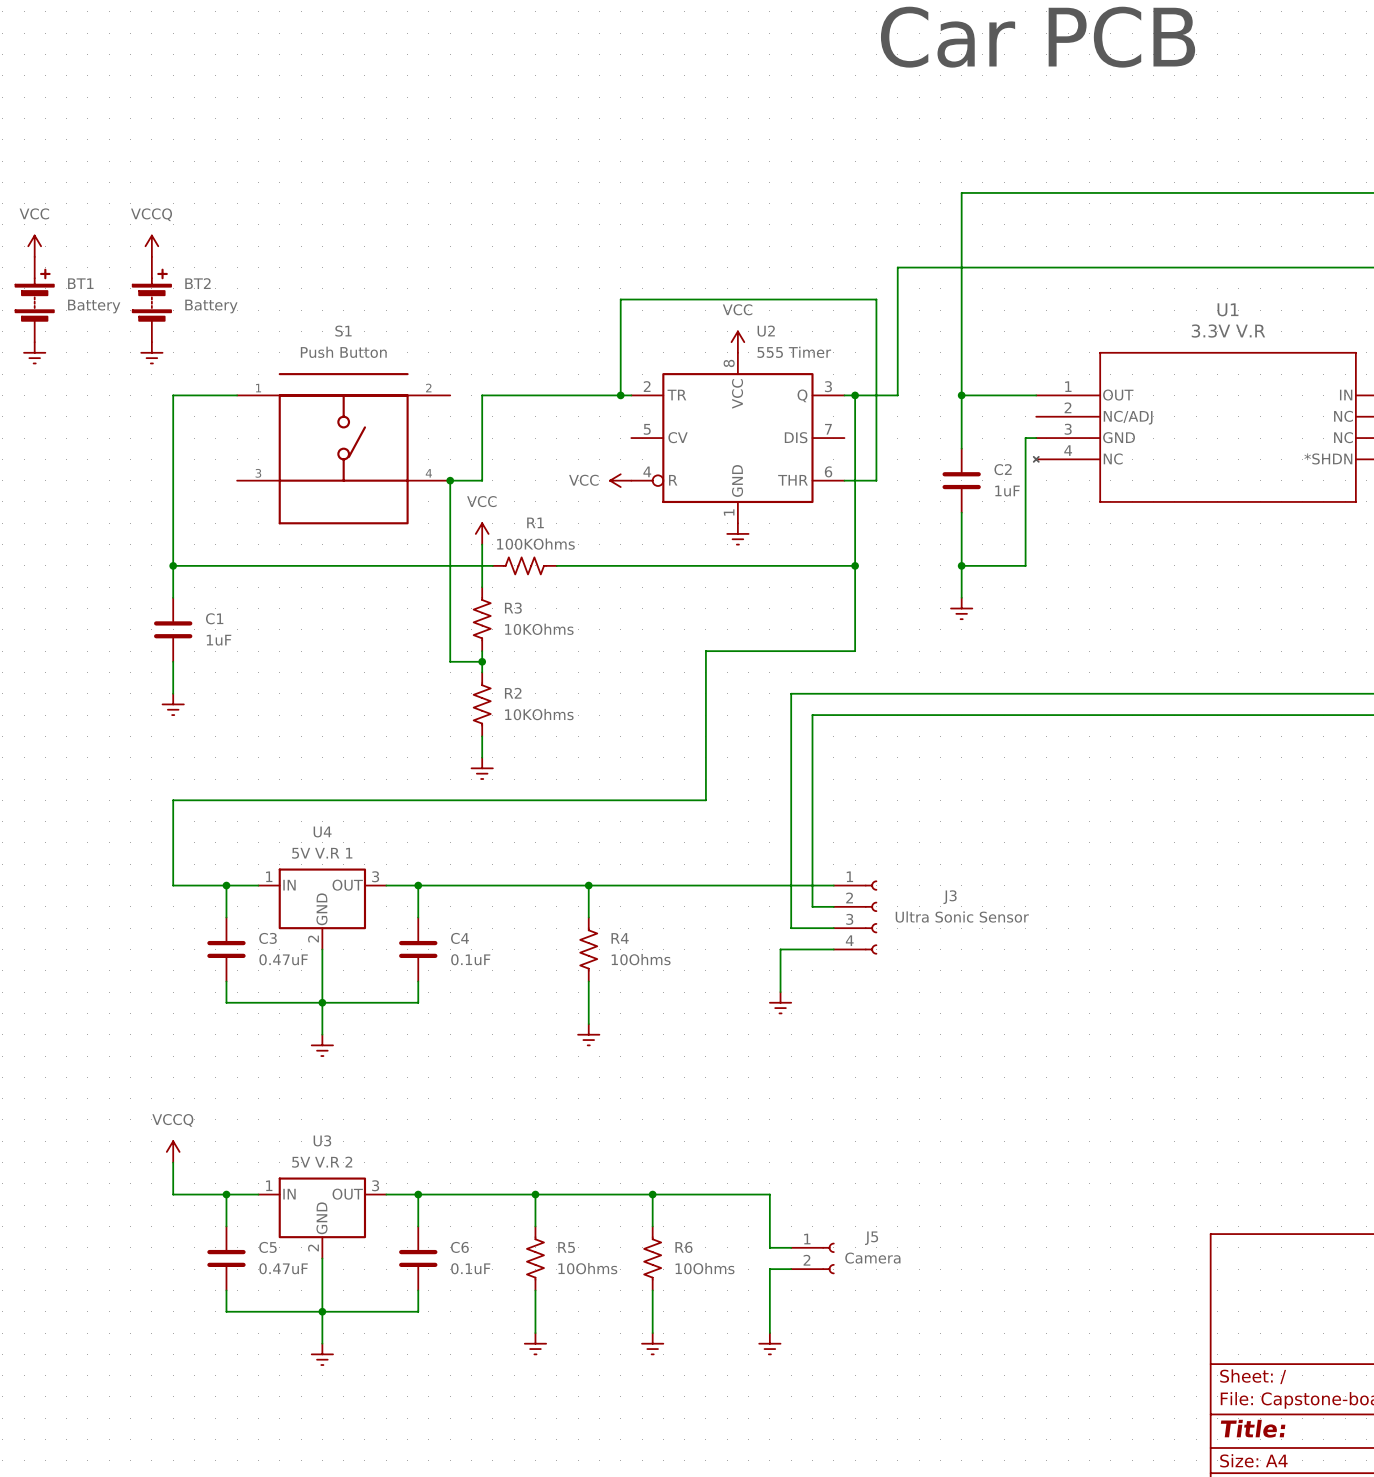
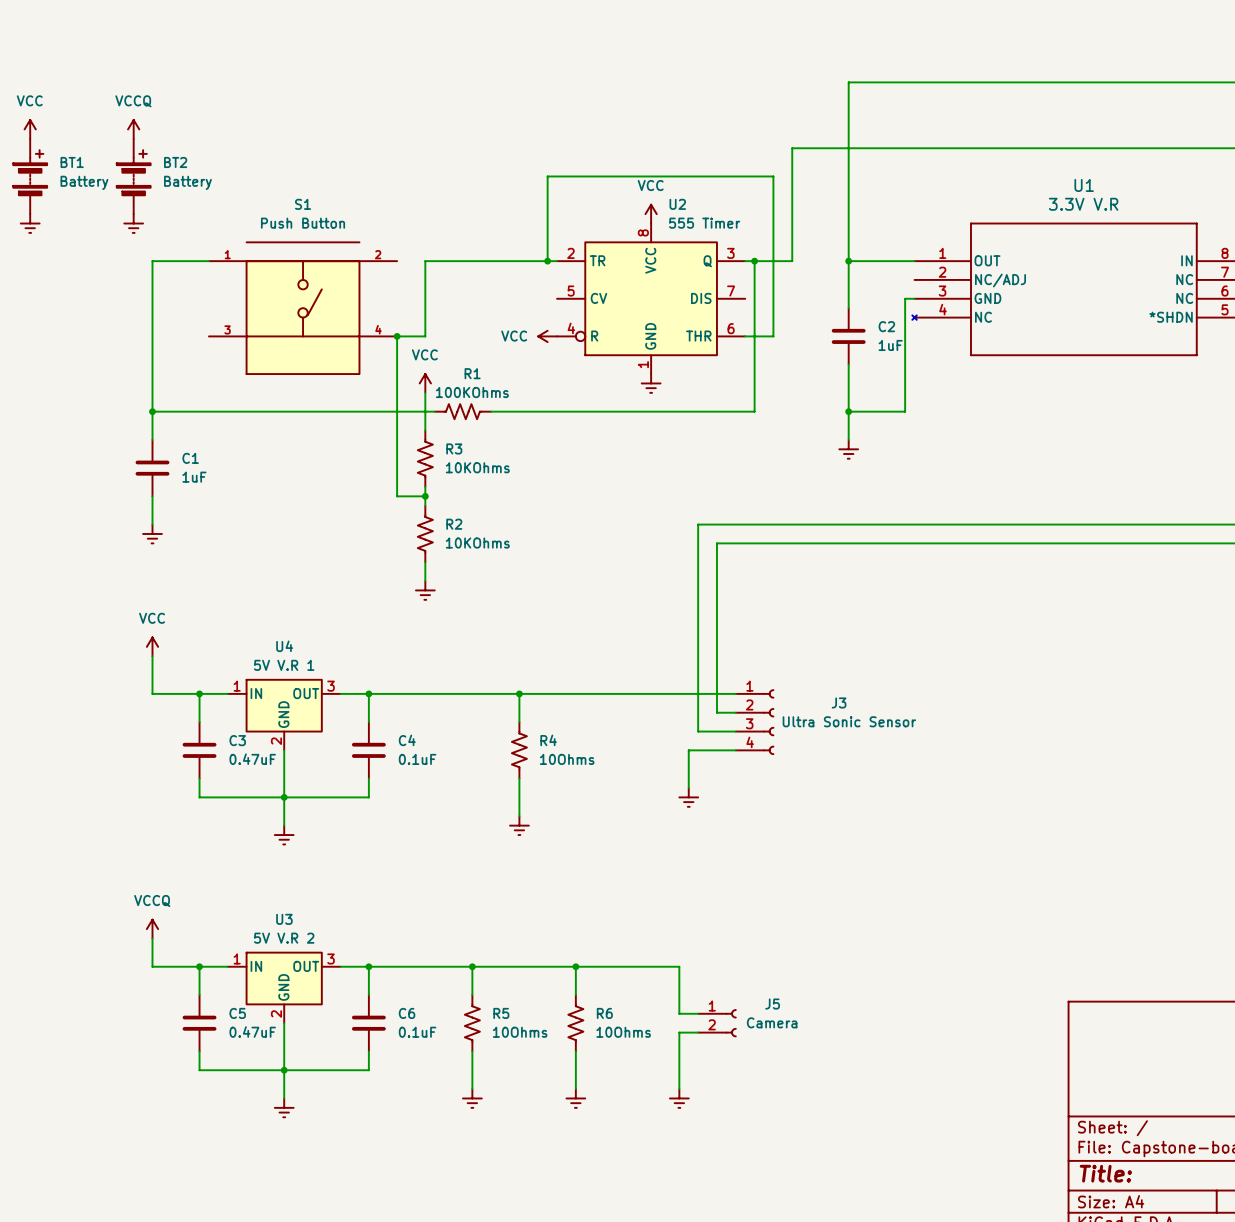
wire: (855, 565) (855, 651) (705, 651) (705, 800) (173, 800) (173, 842) -> none
junction: (855, 565) -> none
power symbol: none -> VCC (152, 646)

